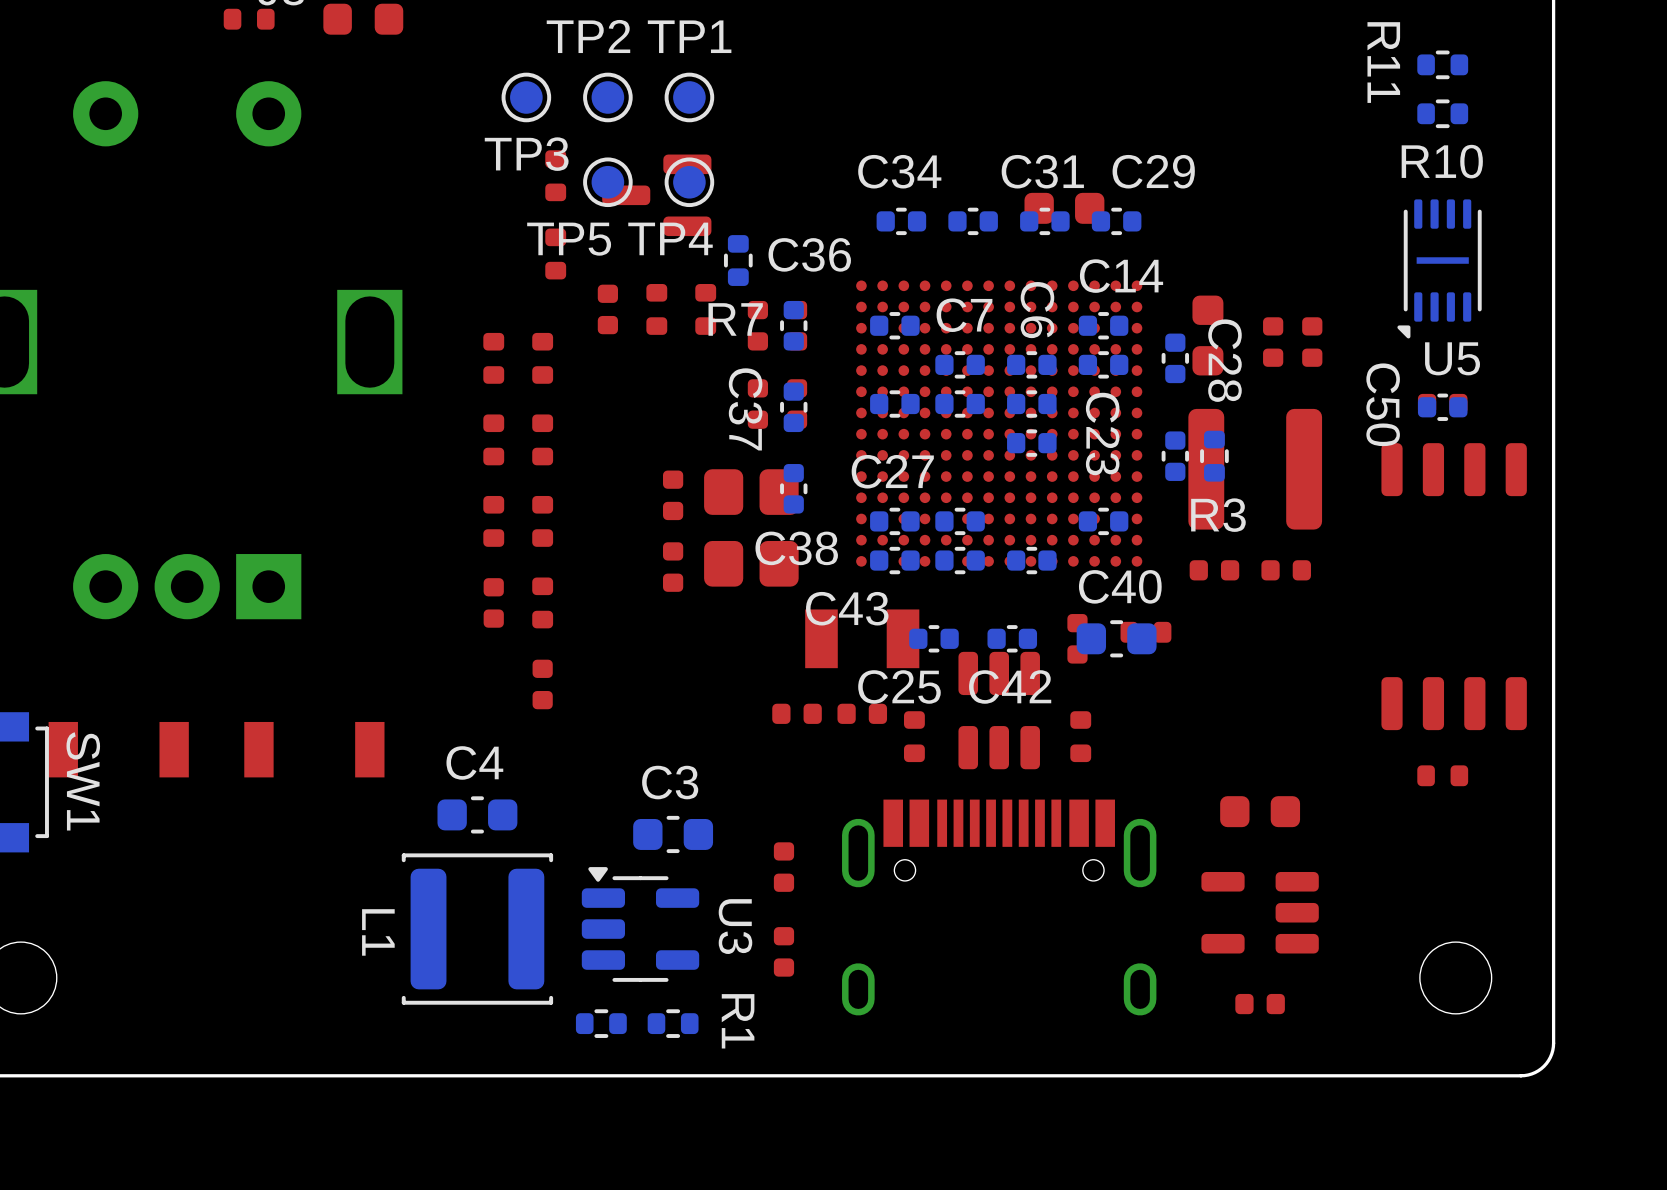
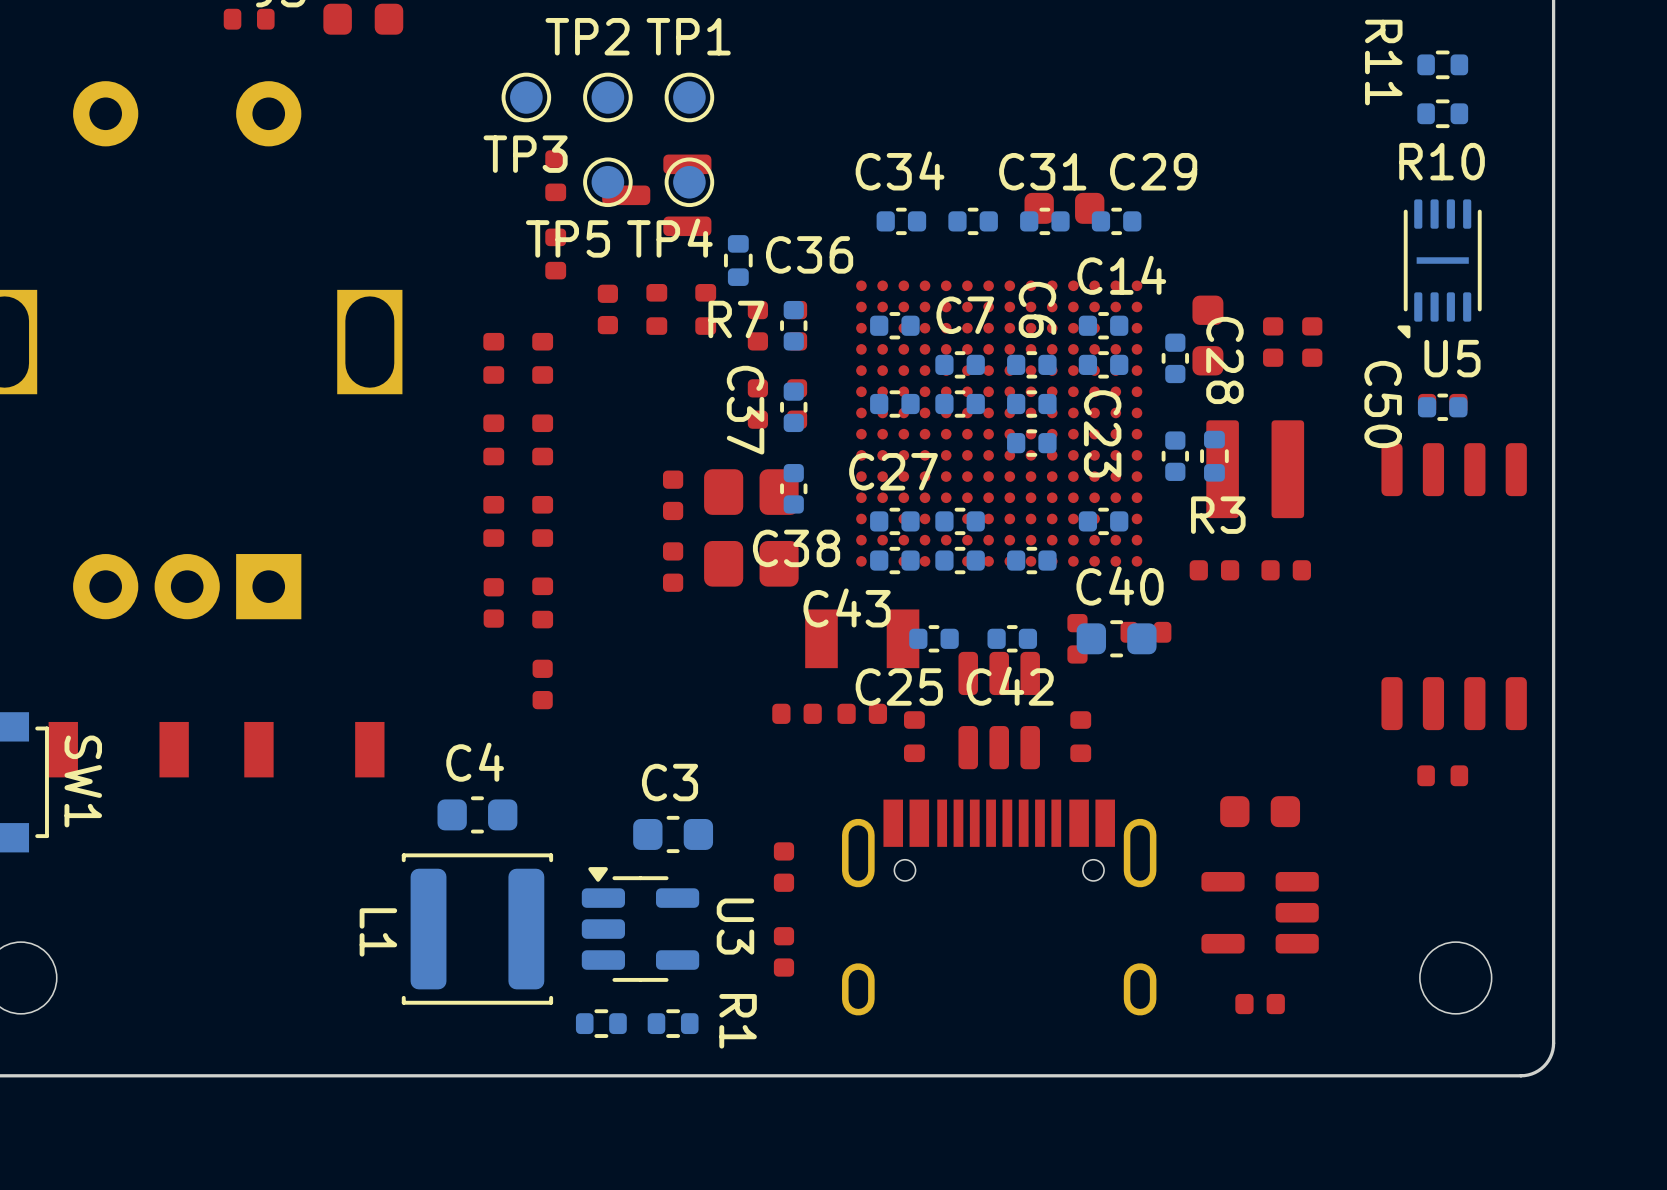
part footprint: [1188, 408, 1323, 530] -> [1206, 420, 1305, 519]

